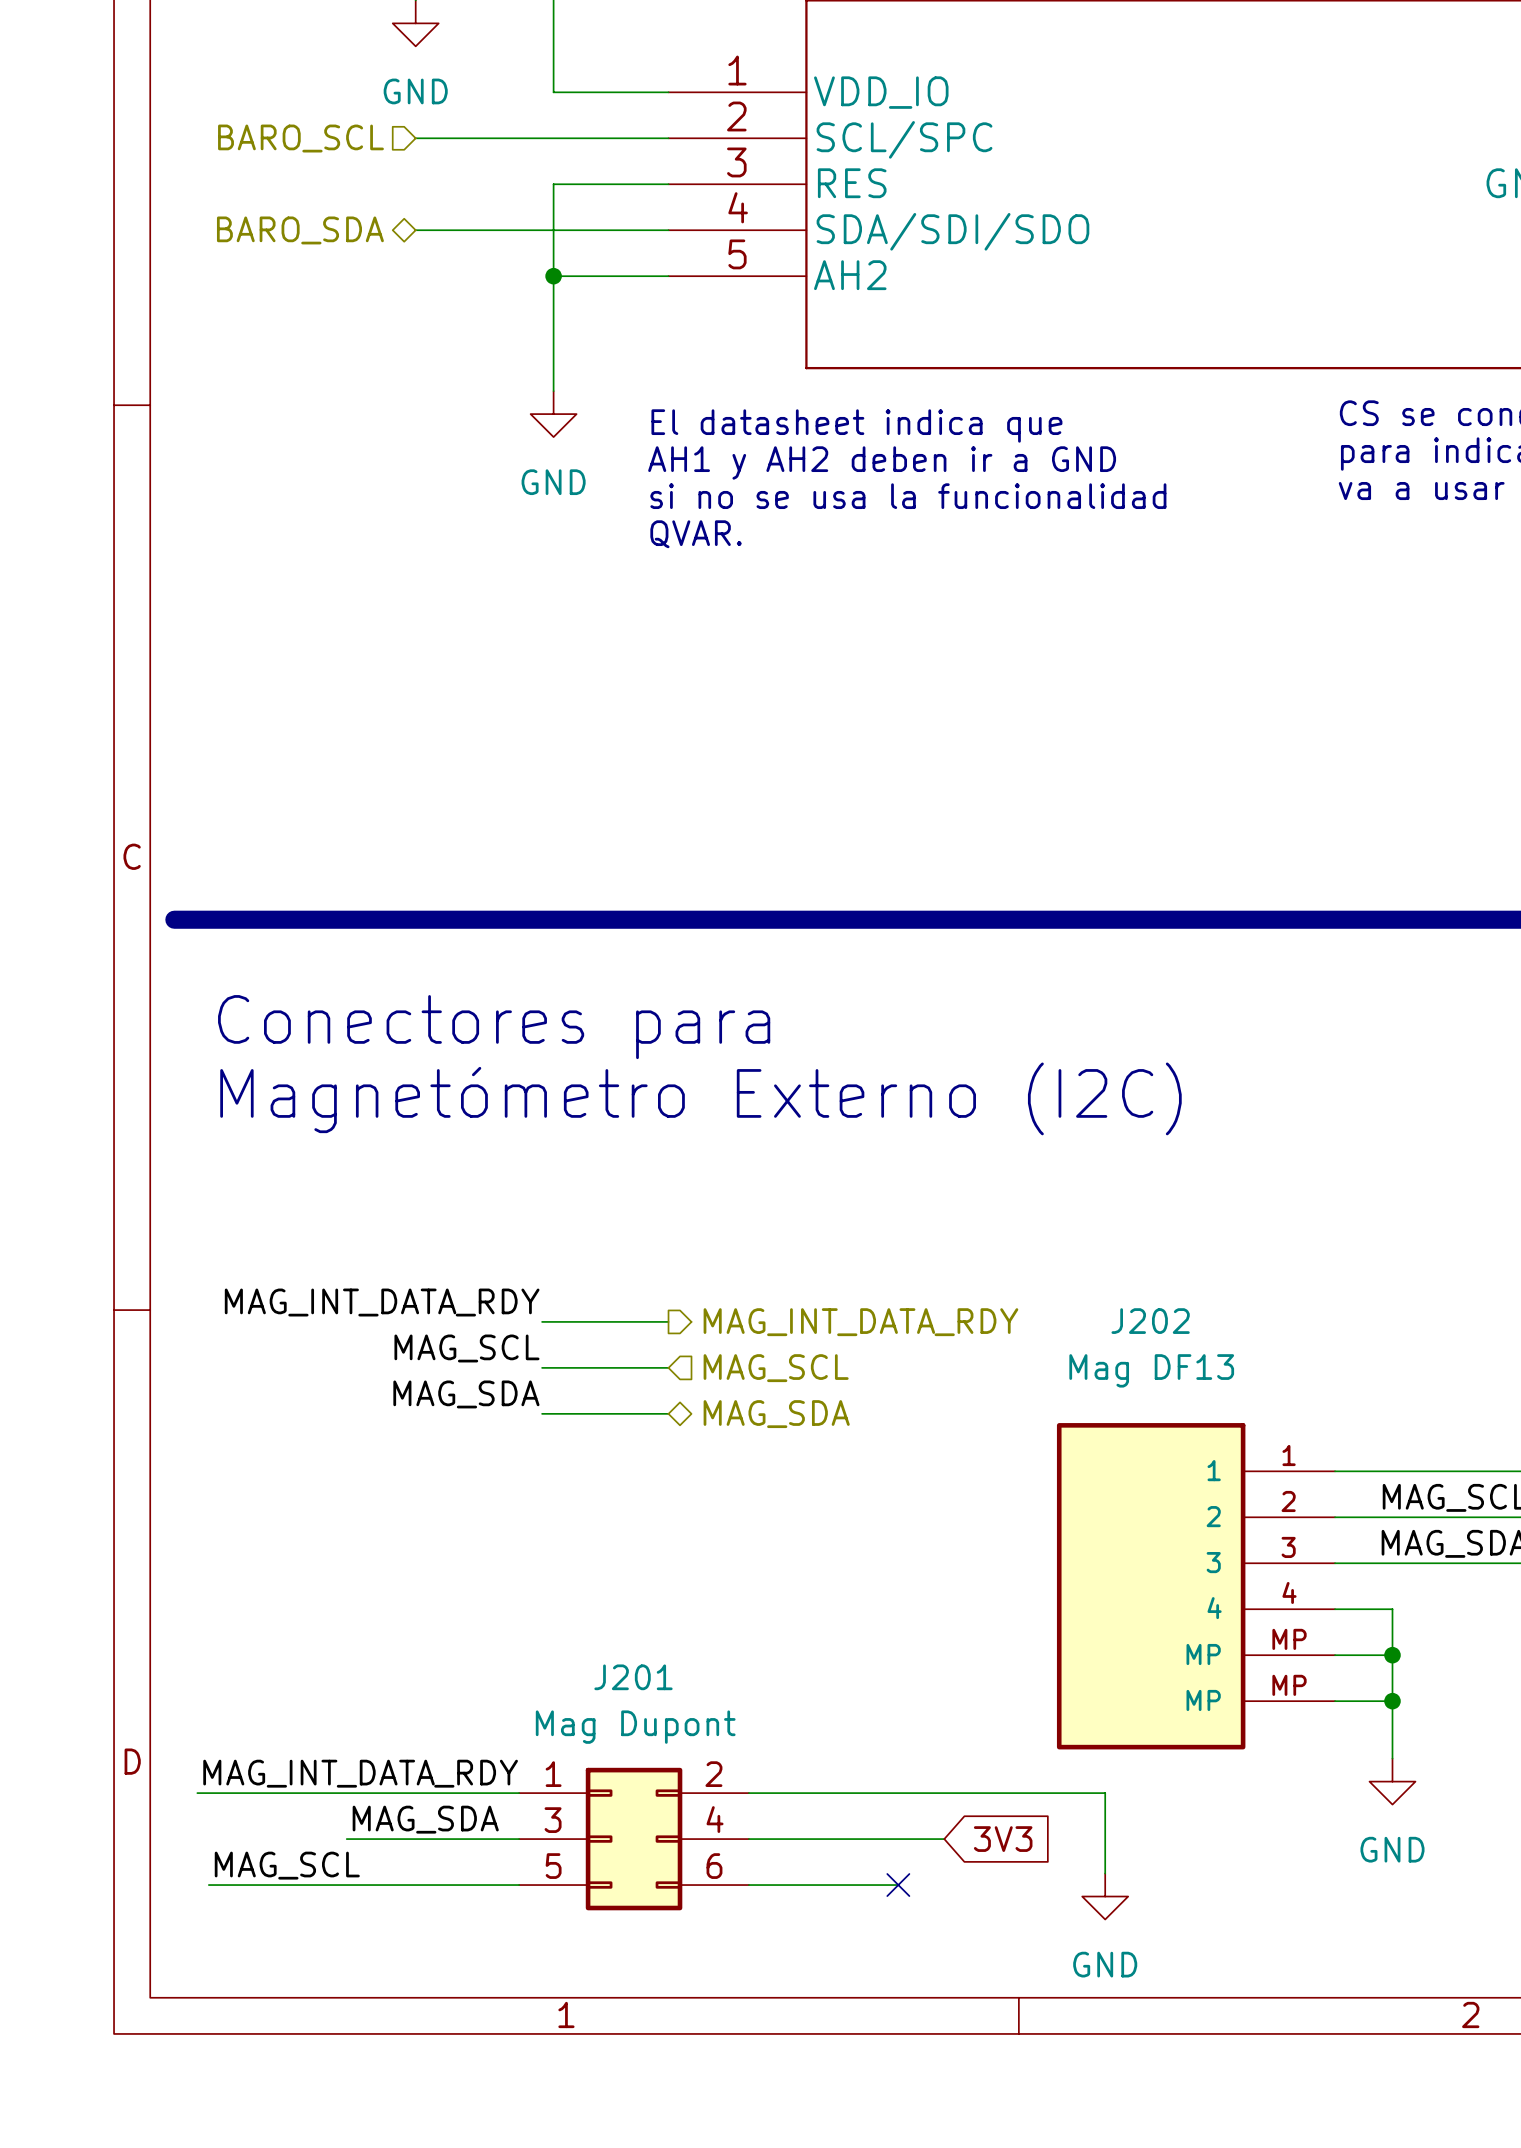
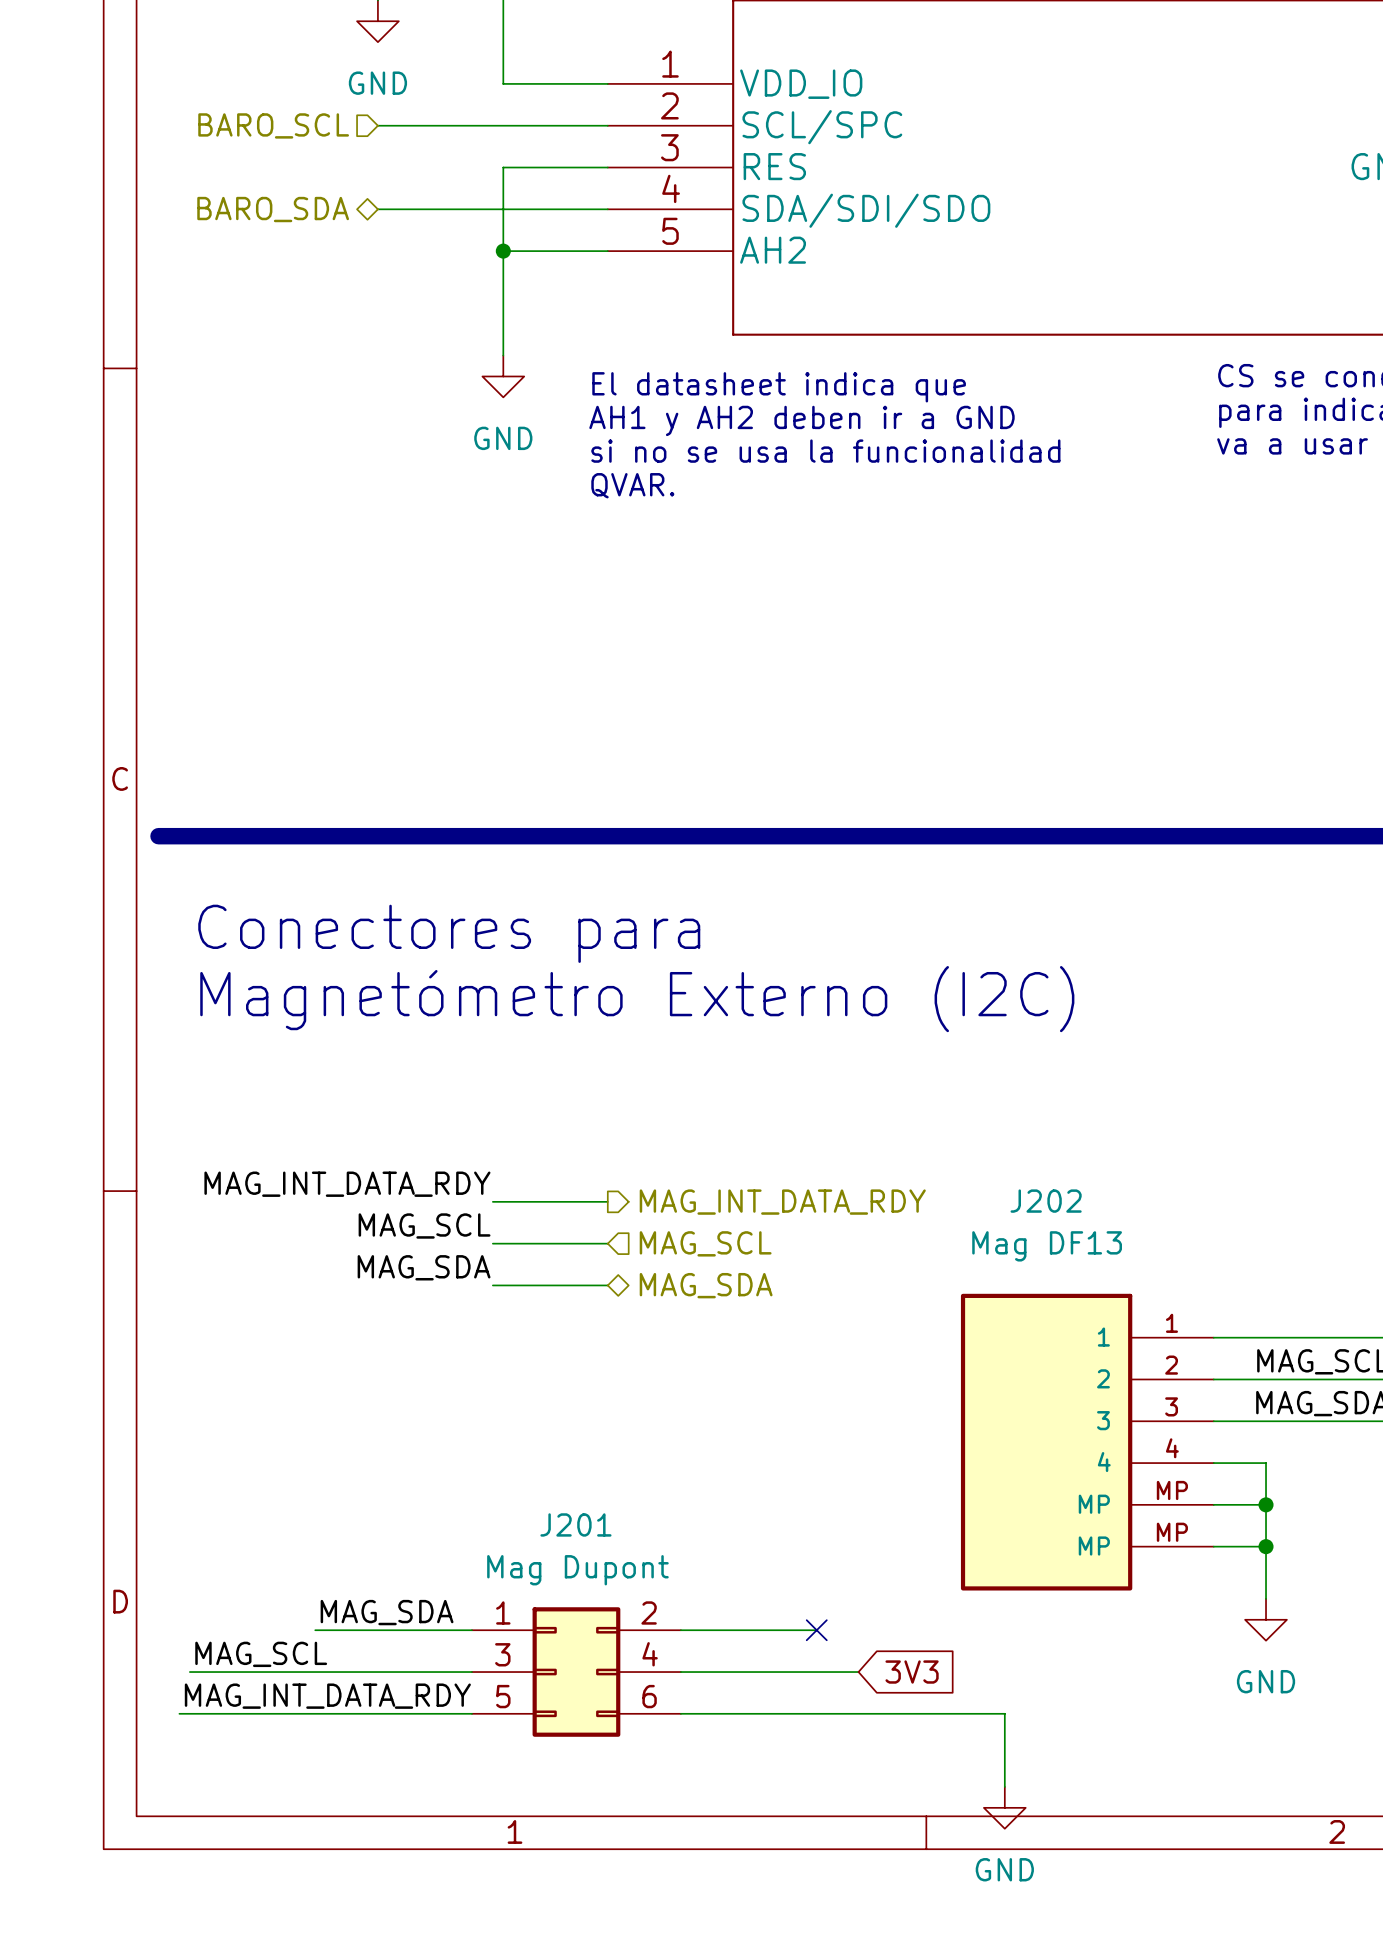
label position: MAG_INT_DATA_RDY (360, 1773) -> MAG_INT_DATA_RDY (327, 1696)
wire: (197, 1793) (346, 1793) -> none
wire: (898, 1793) (1105, 1793) (1105, 1873) -> (816, 1713) (1004, 1713) (1004, 1786)
label position: MAG_SDA (425, 1819) -> MAG_SDA (387, 1612)
wire: none -> (189, 1672) (315, 1672)
label position: MAG_SCL (287, 1865) -> MAG_SCL (261, 1654)
wire: none -> (179, 1713) (189, 1713)
no-connect mark position: (898, 1885) -> (816, 1630)
power symbol position: GND (1105, 1896) -> GND (1004, 1807)

